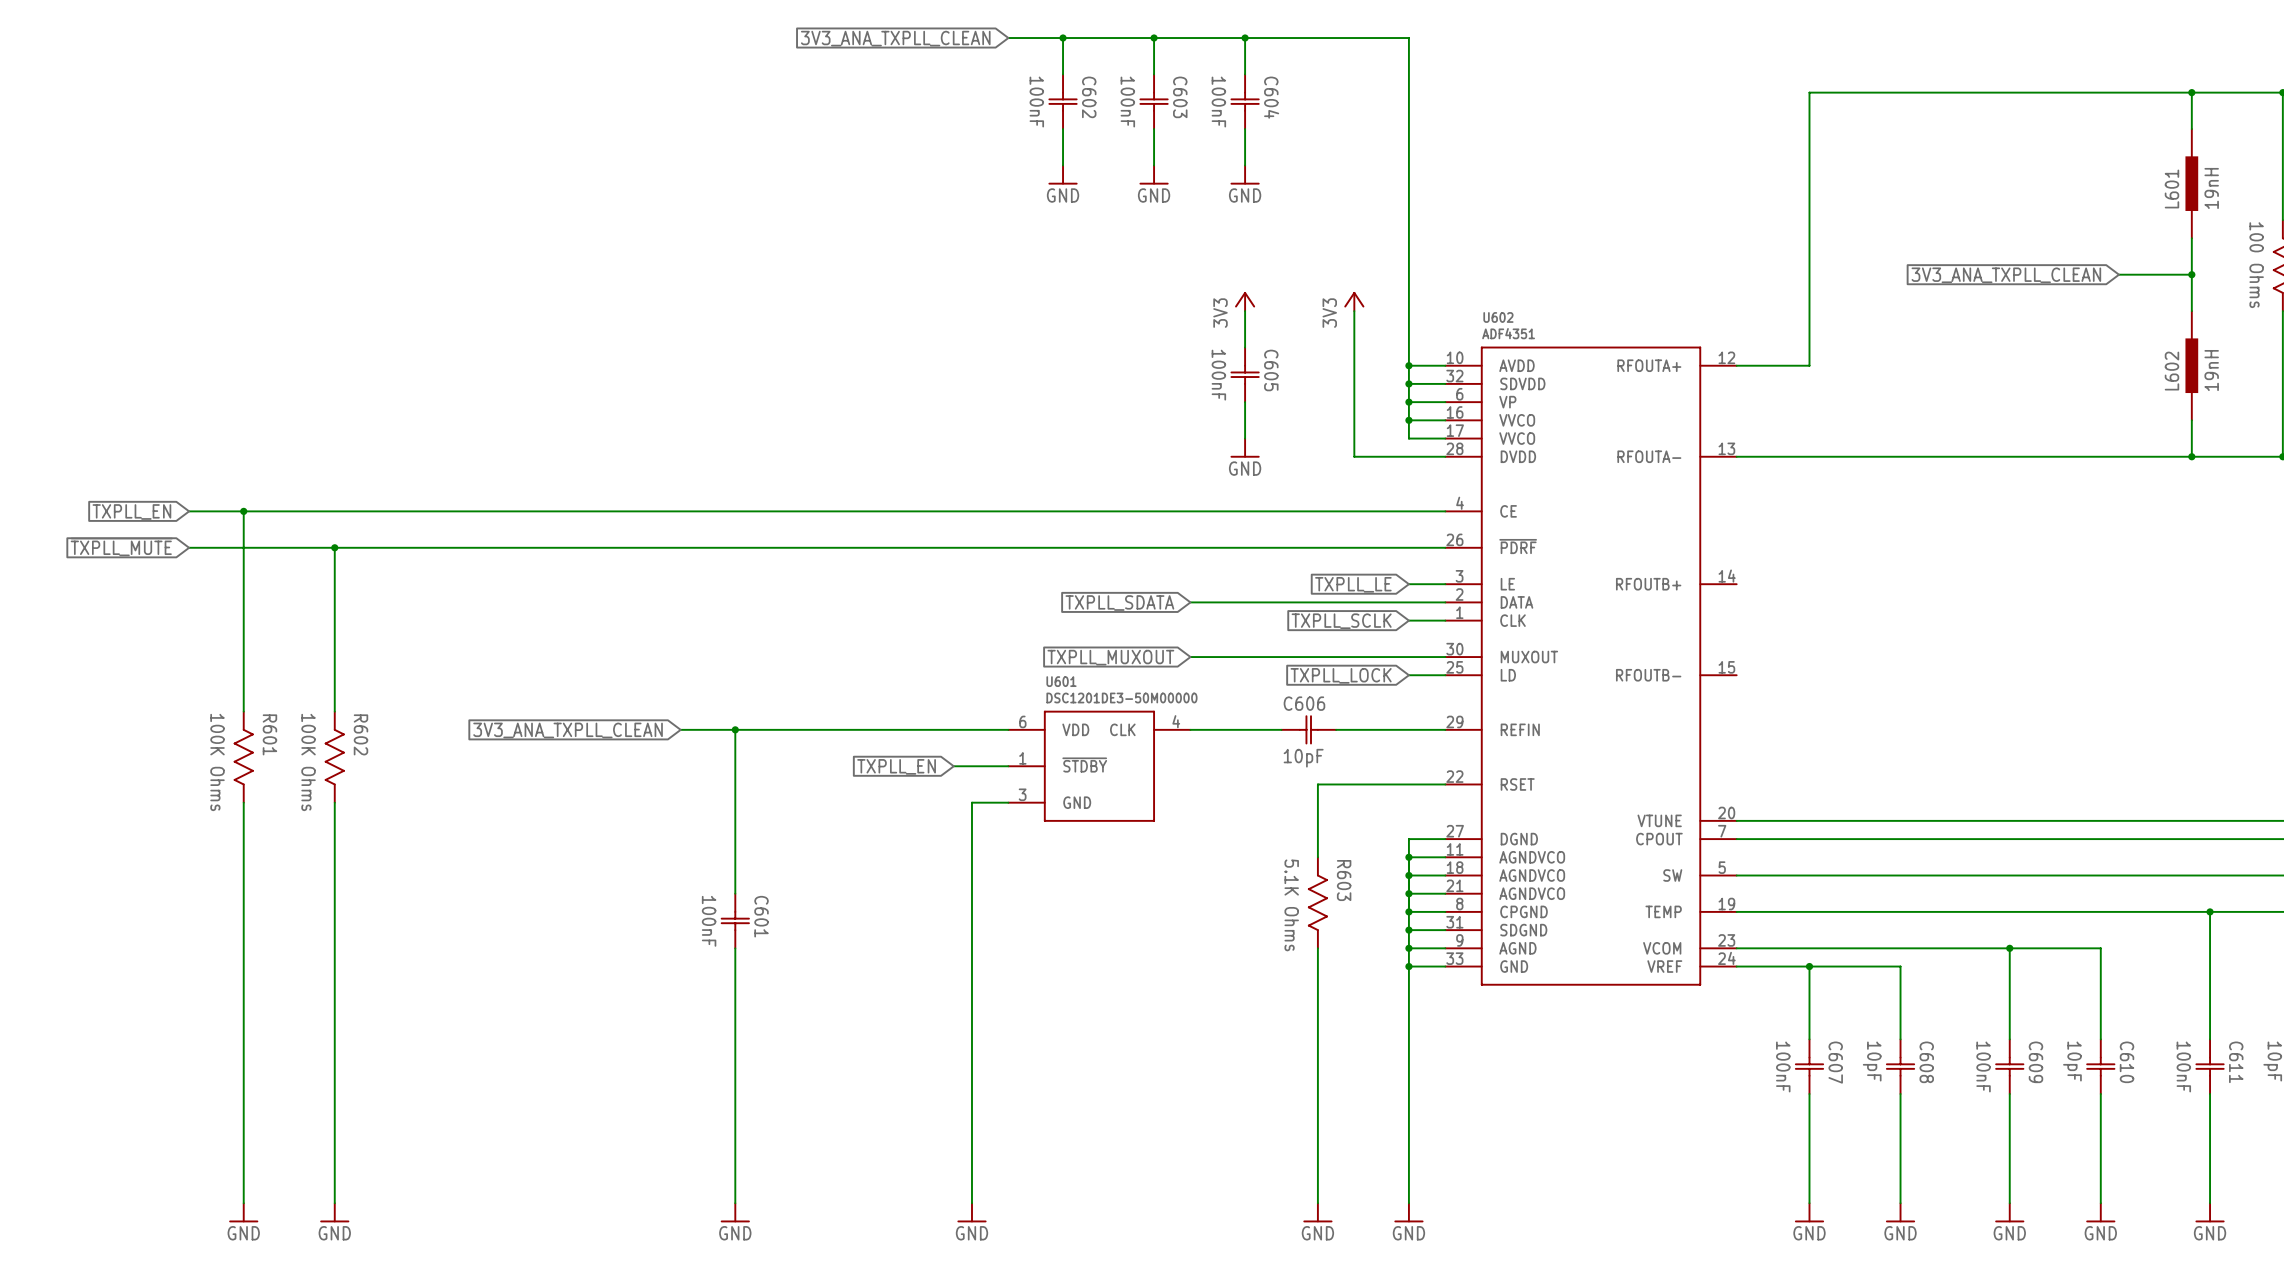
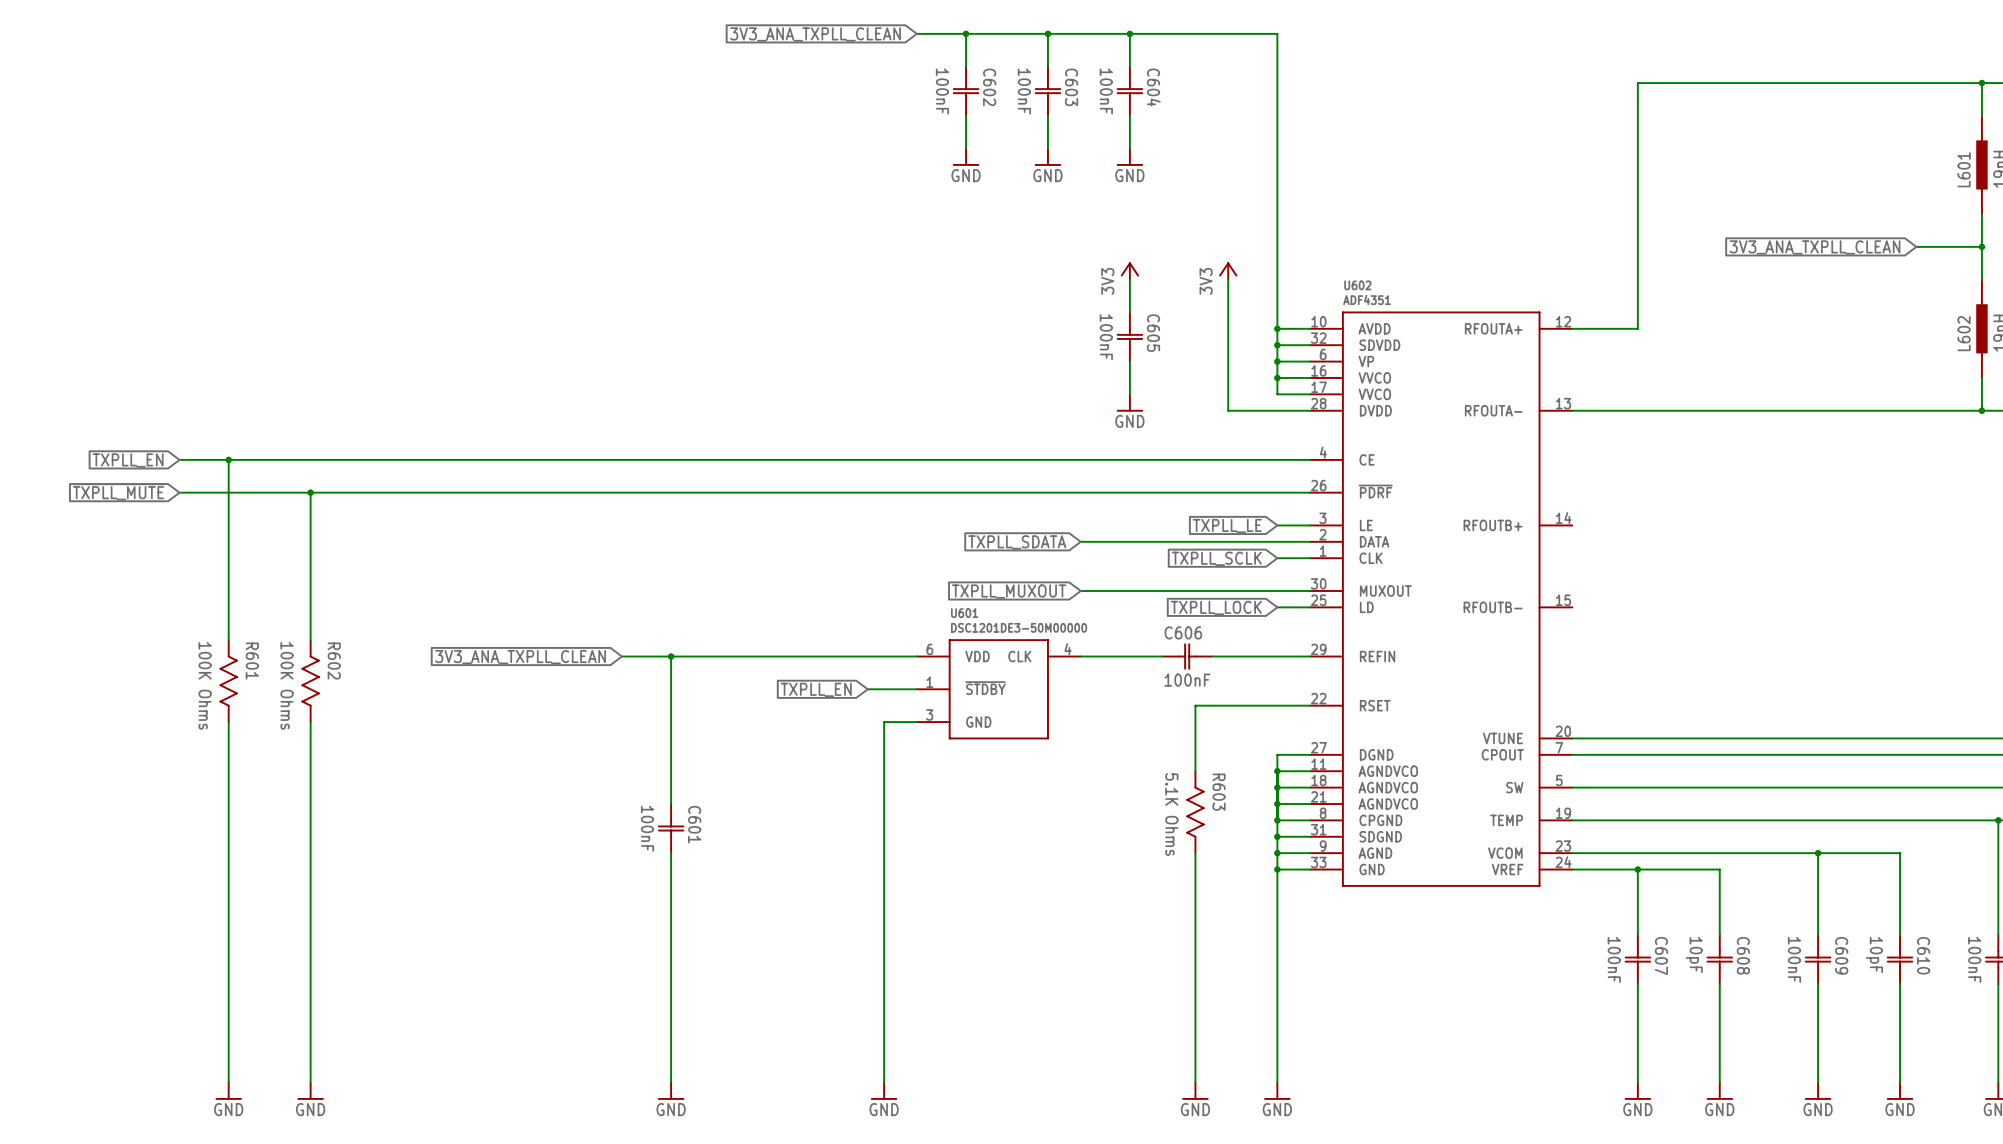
C606 value: 10pF (1303, 758) -> 100nF (1187, 680)

